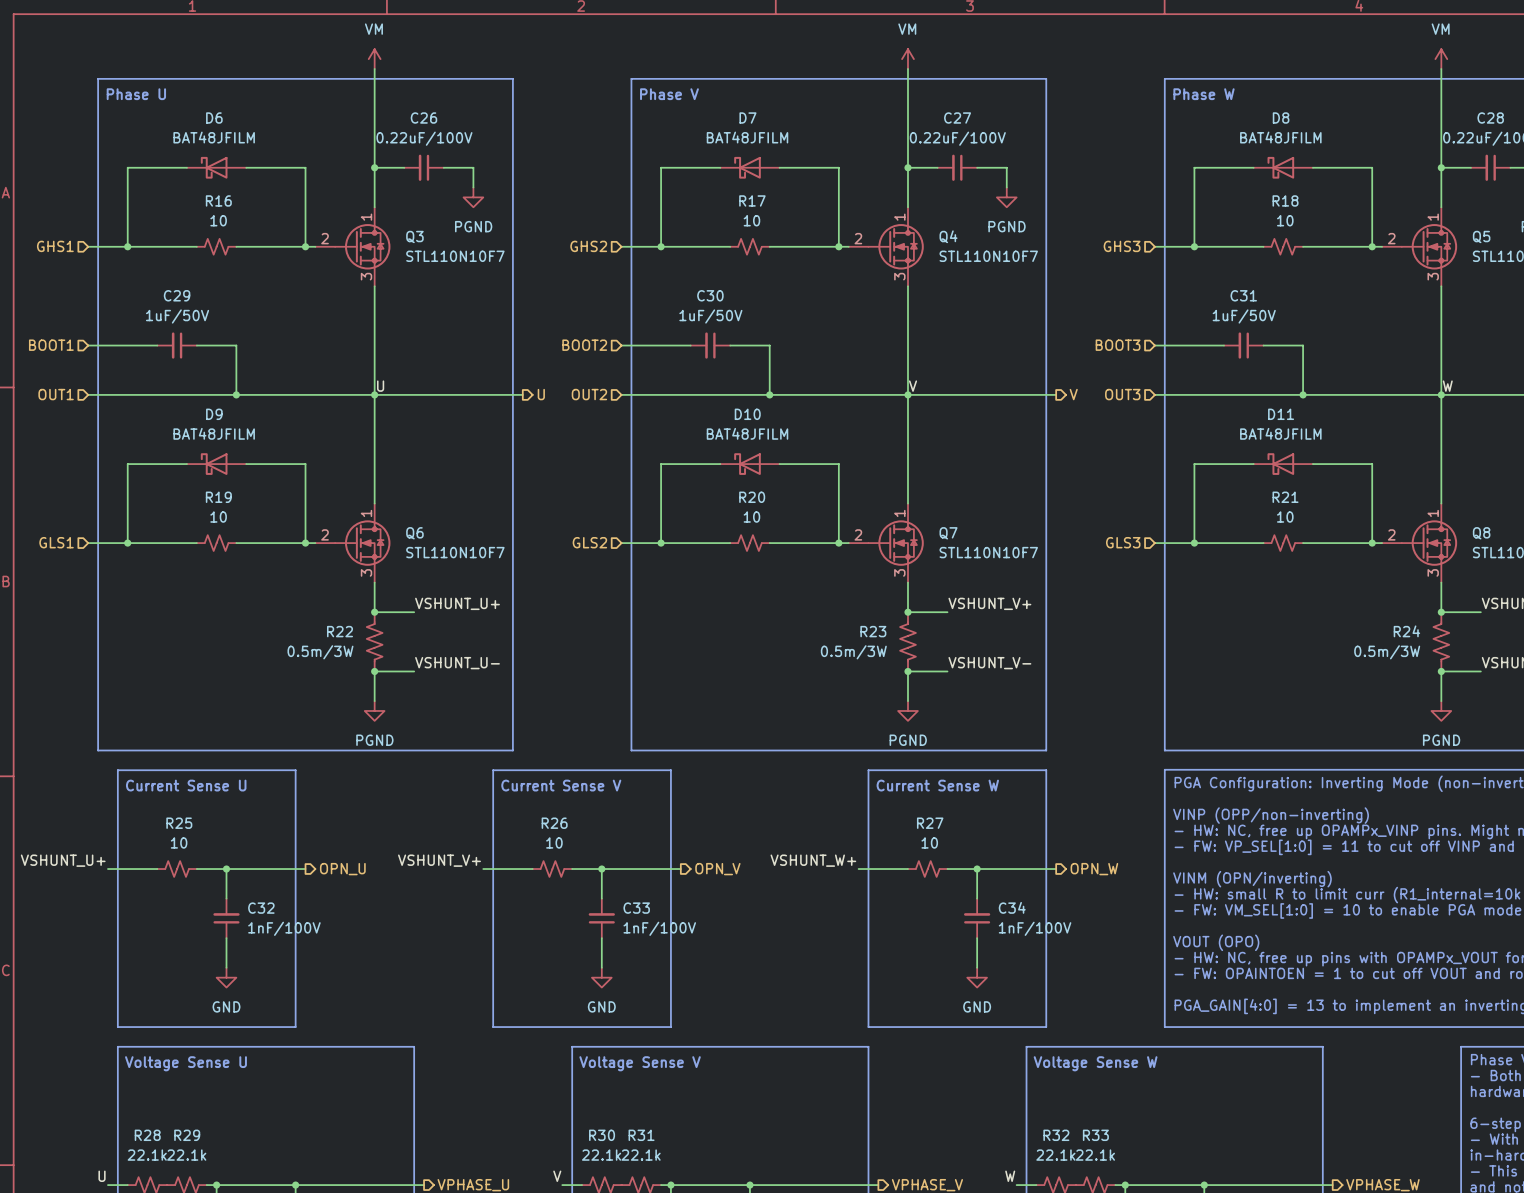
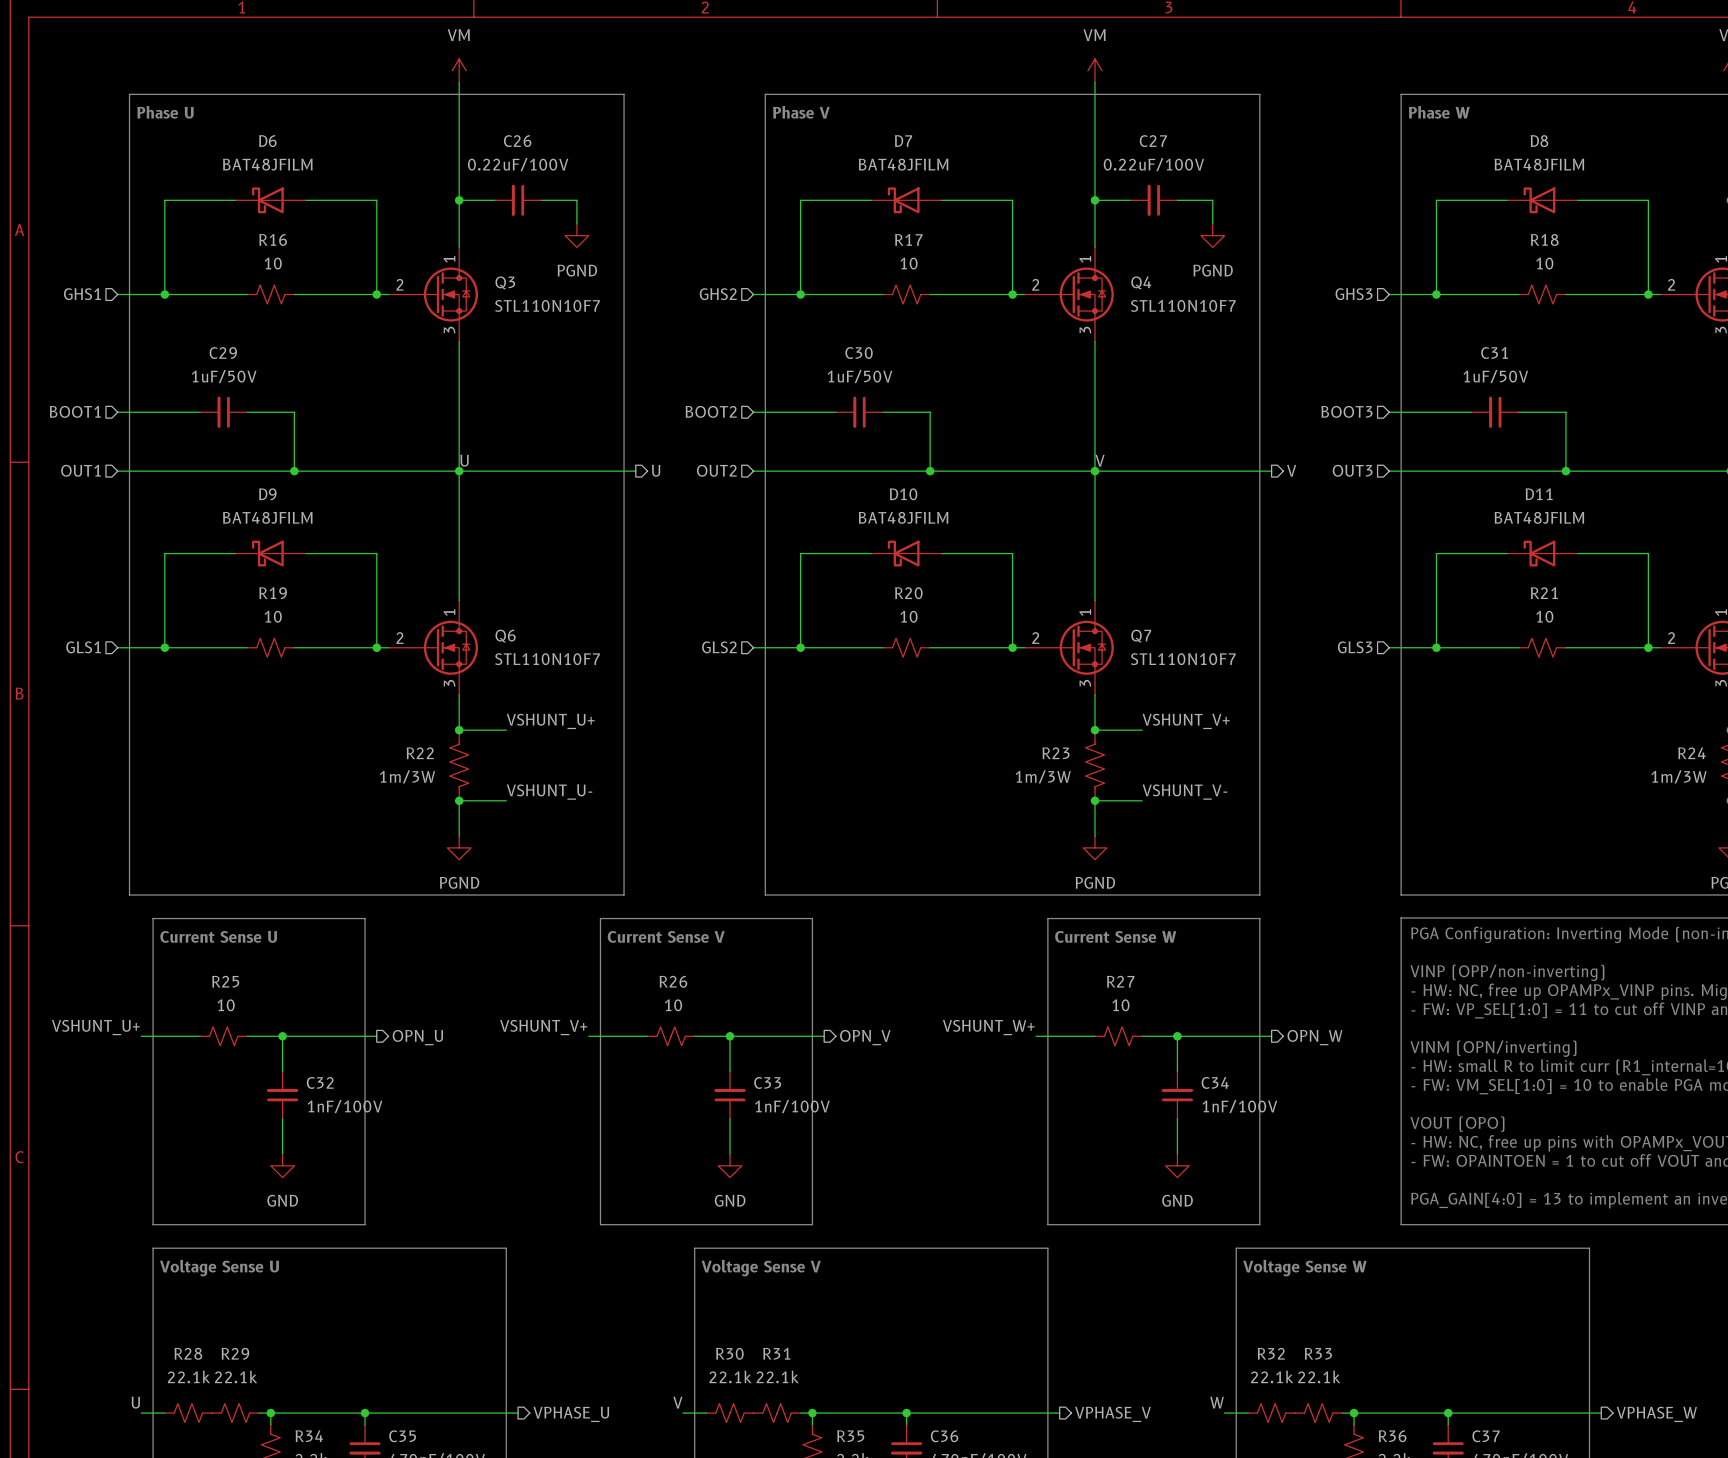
R22 value: 0.5m/3W (320, 652) -> 1m/3W (407, 776)
R23 value: 0.5m/3W (853, 652) -> 1m/3W (1043, 776)
R24 value: 0.5m/3W (1387, 652) -> 1m/3W (1679, 776)

